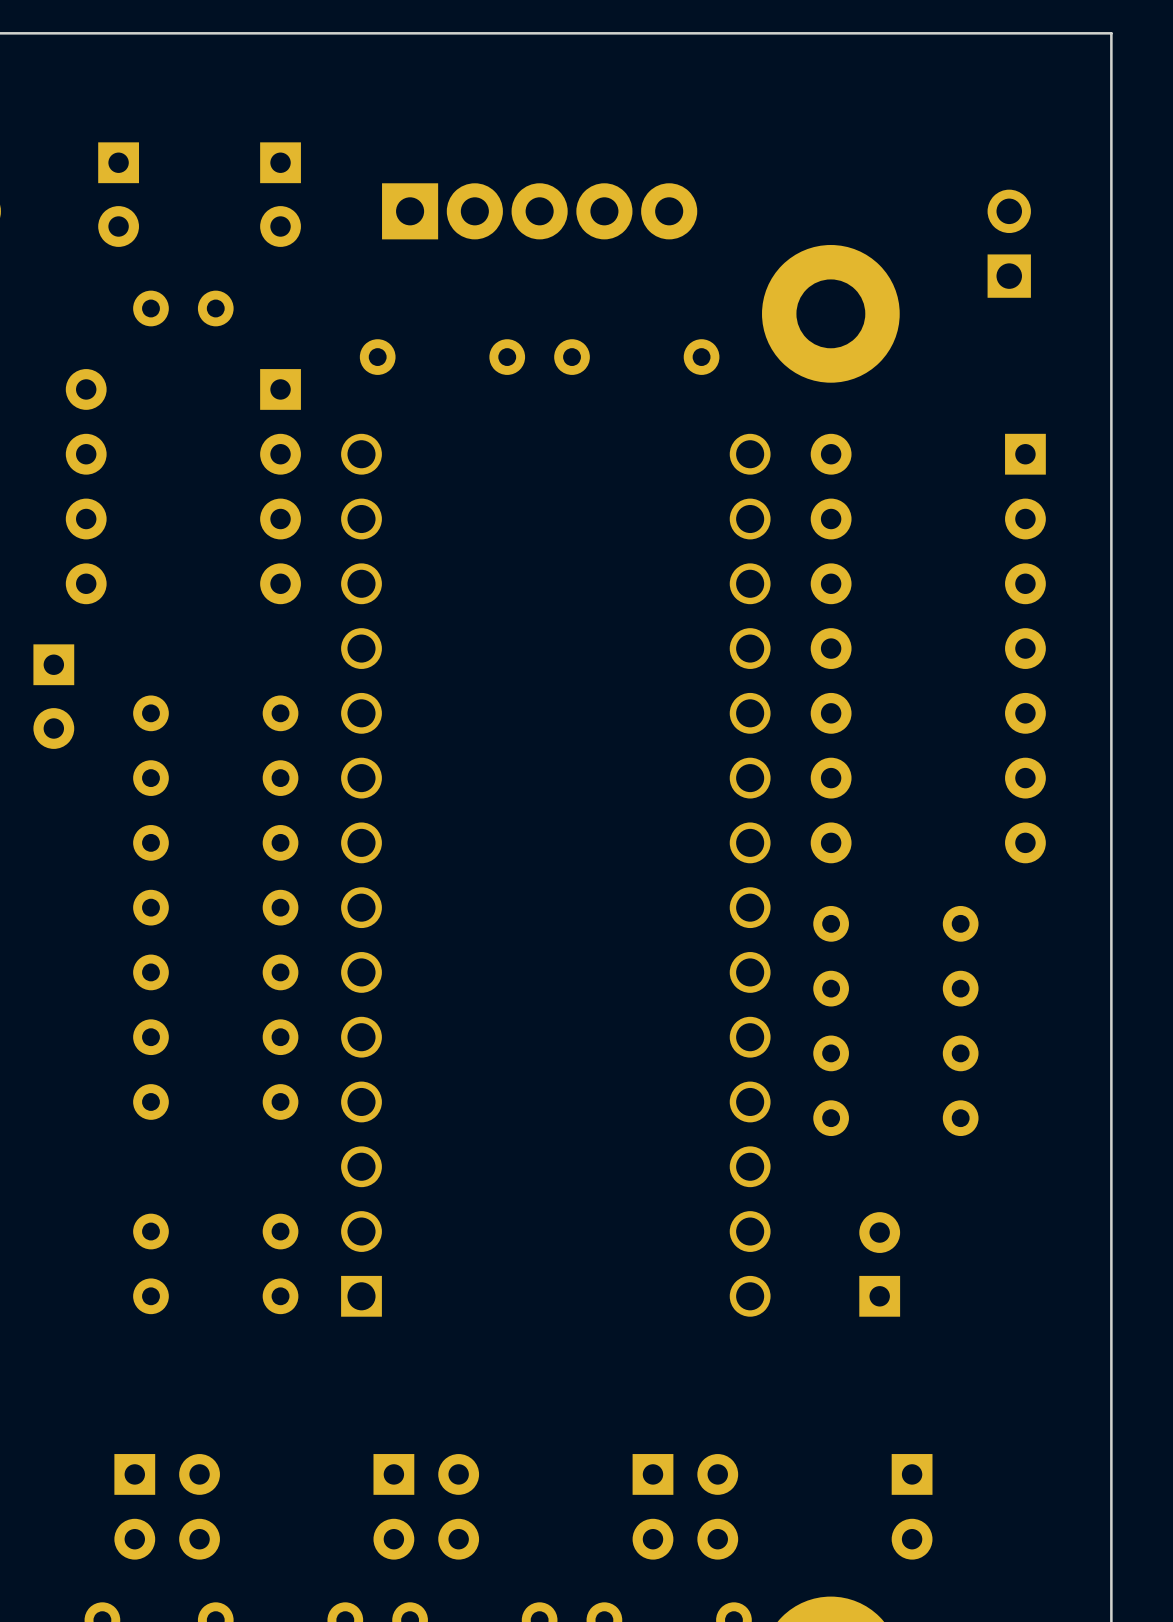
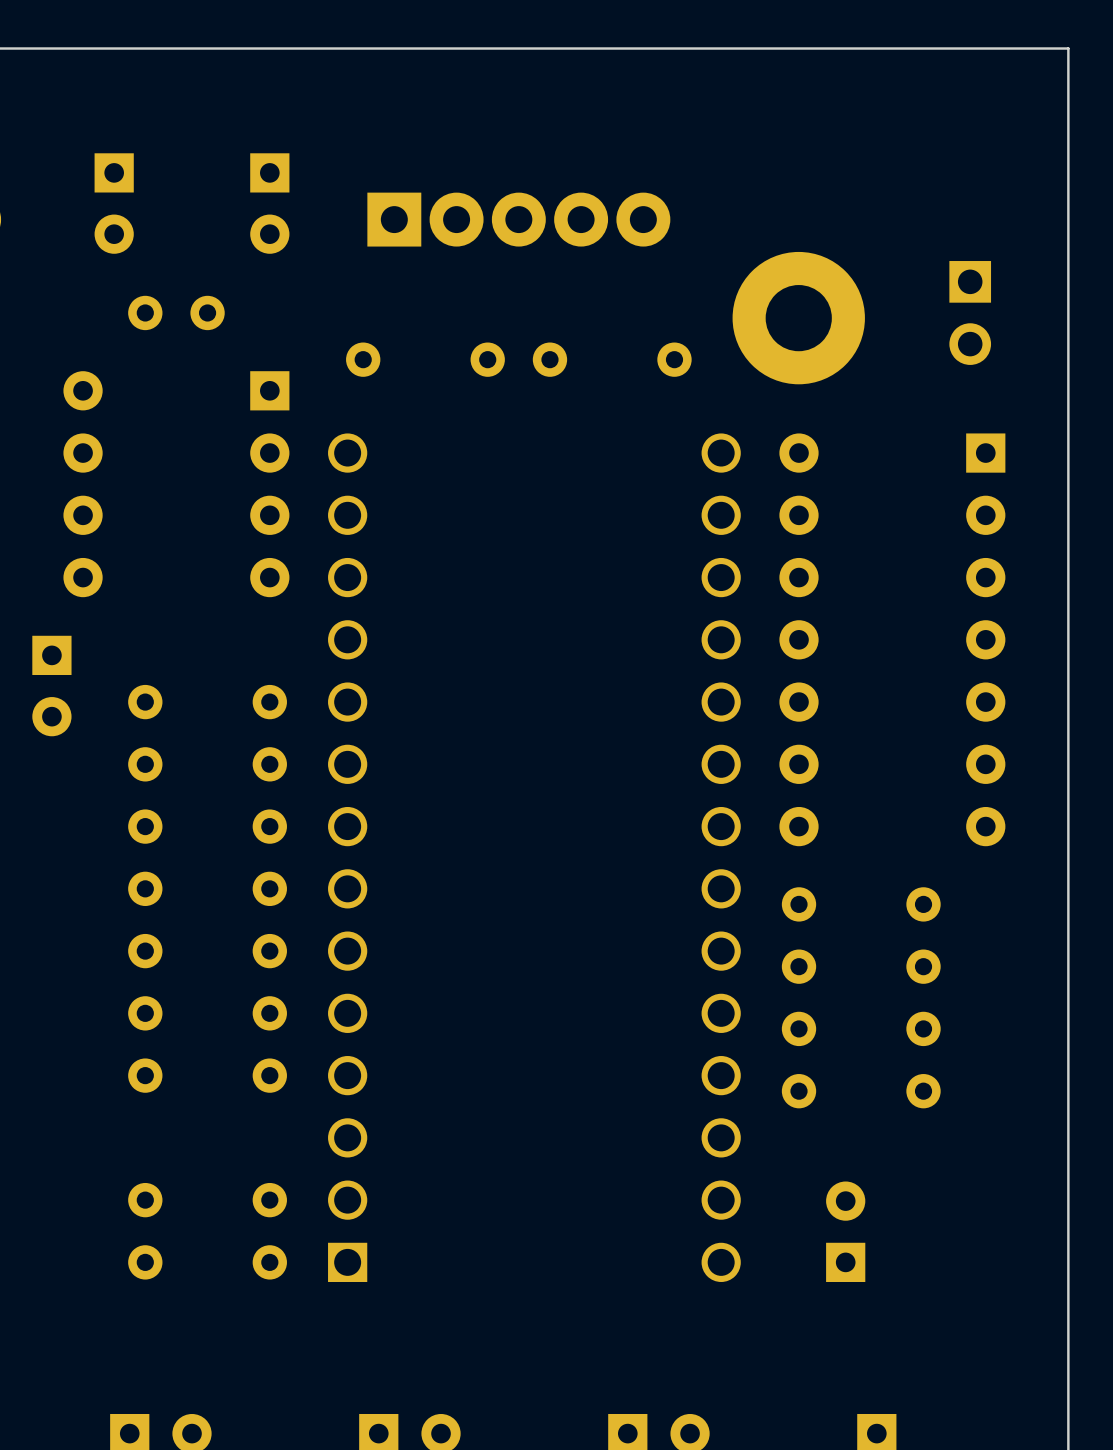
part rotation: 0° (1009, 243) -> 180° (970, 312)

